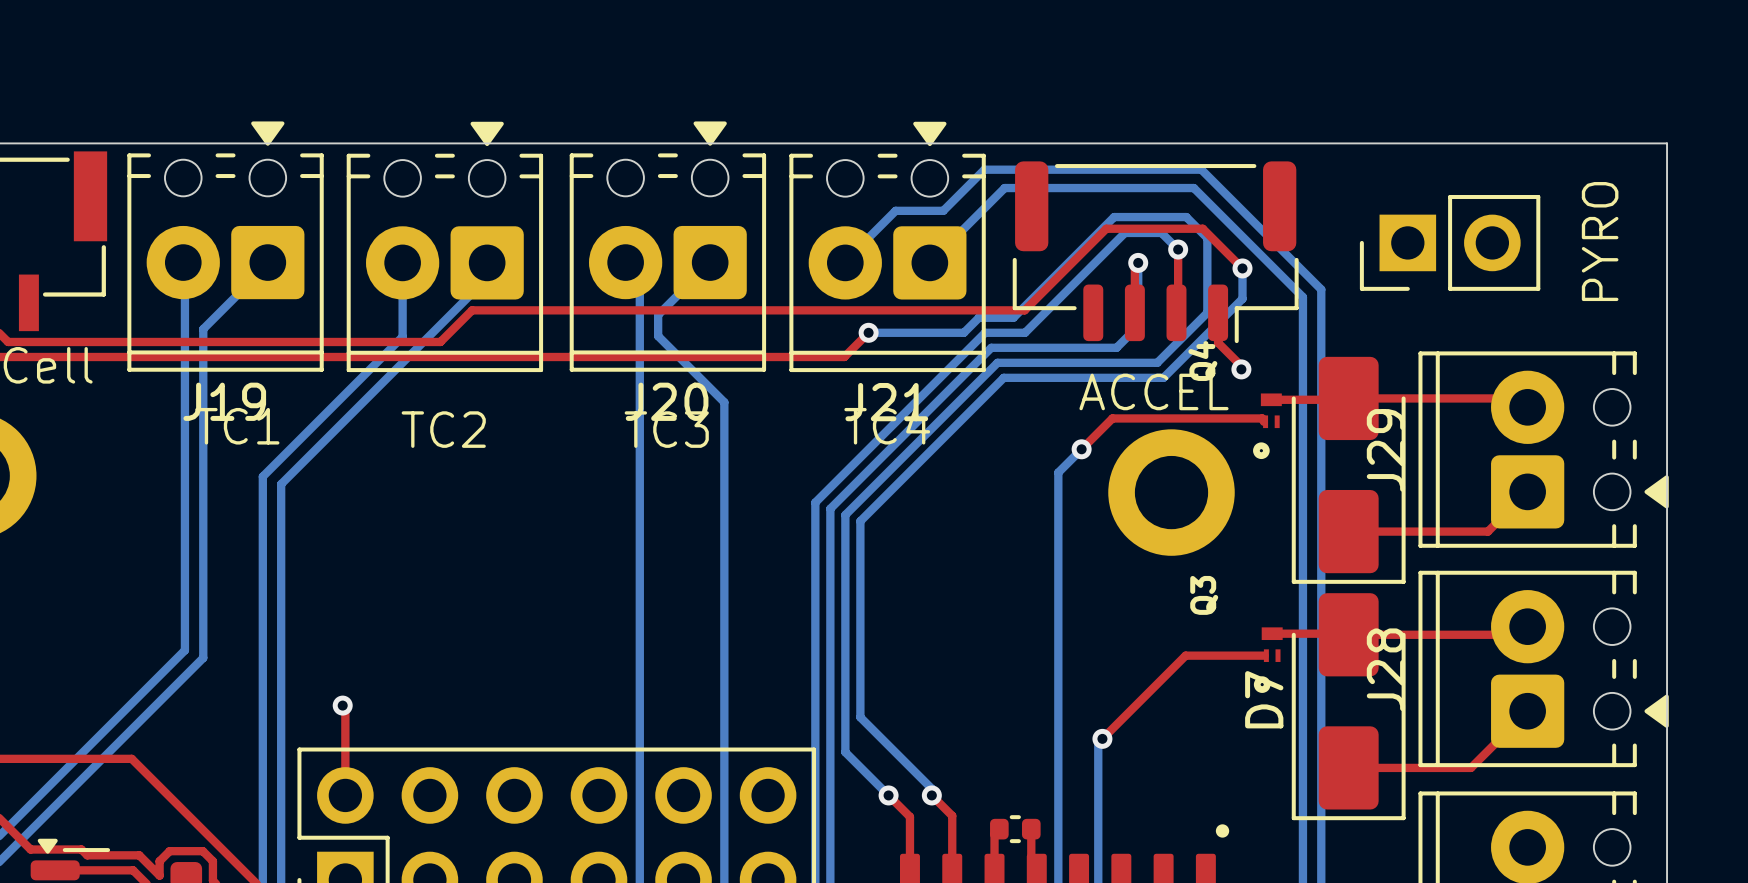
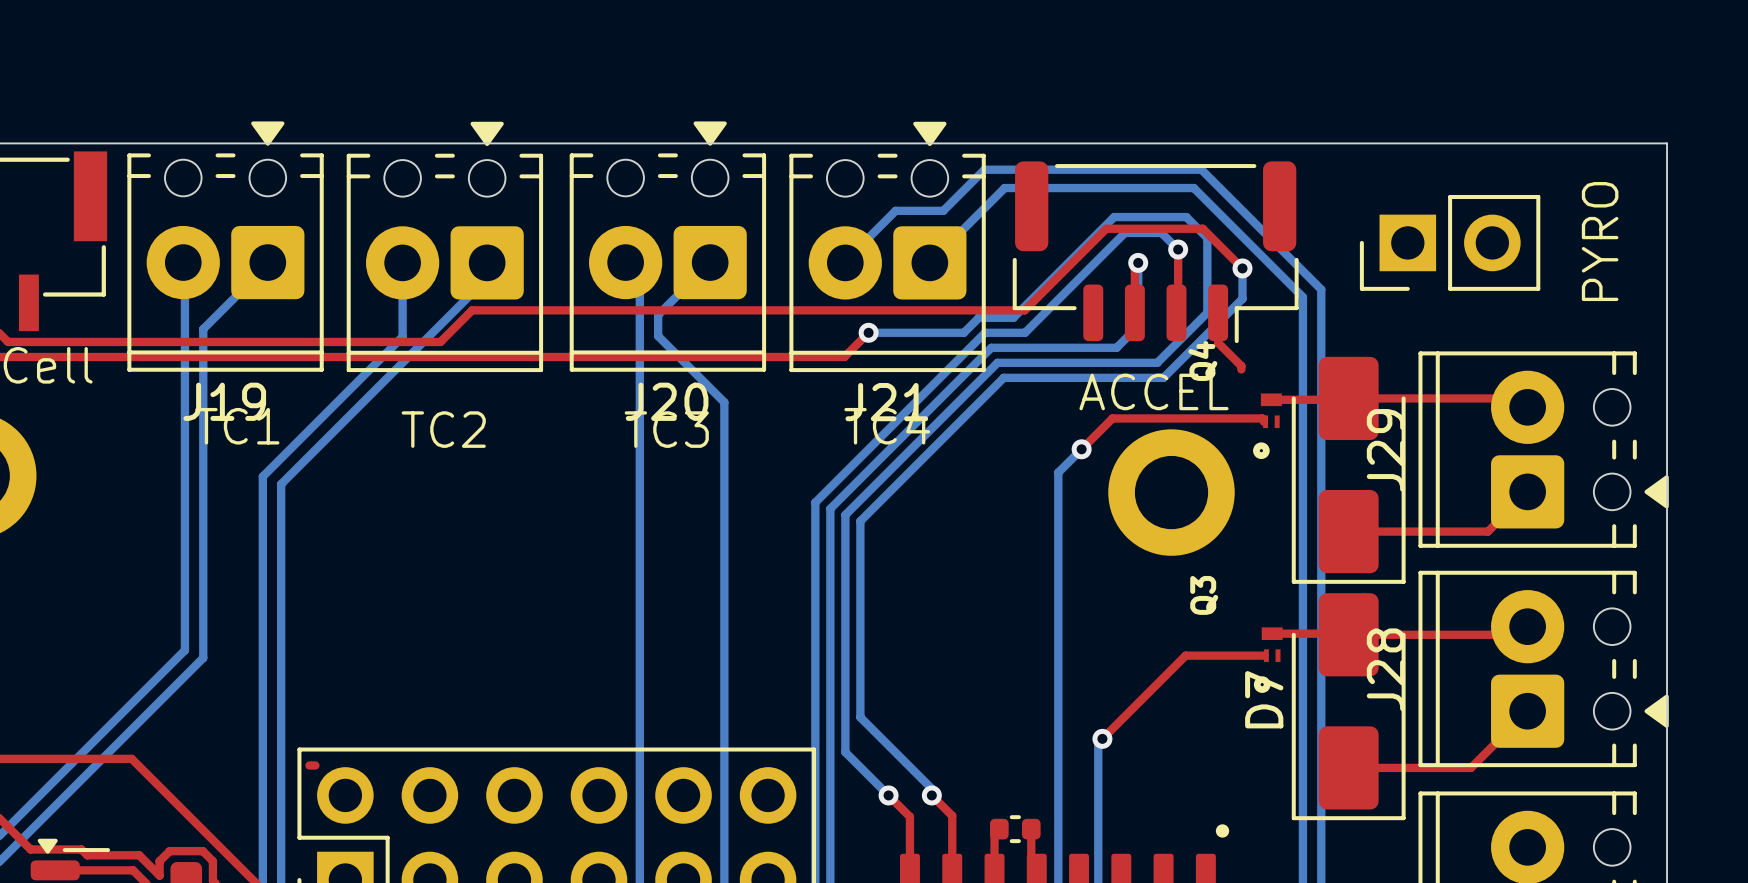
via: (1241, 369) -> none
top track: (342, 705) (345, 708) (345, 795) -> none
via: (342, 705) -> none
top track: none -> (309, 765) (315, 765)

